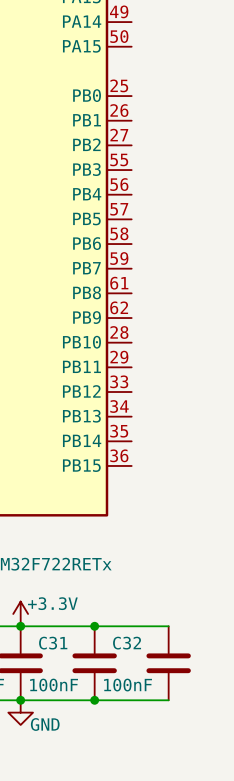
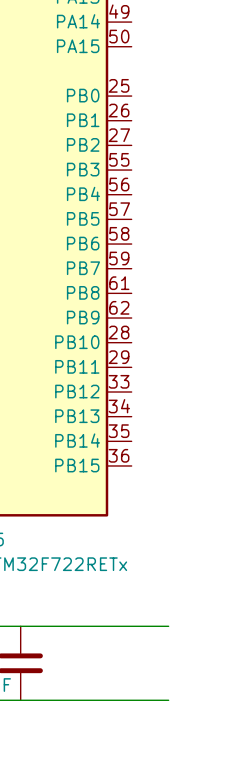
power symbol: +3.3V (20, 613) -> none
junction: (20, 626) -> none
junction: (94, 626) -> none
C31: 100nF (94, 663) -> none
C32: 100nF (168, 663) -> none
junction: (20, 700) -> none
junction: (94, 700) -> none
power symbol: GND (20, 712) -> none

